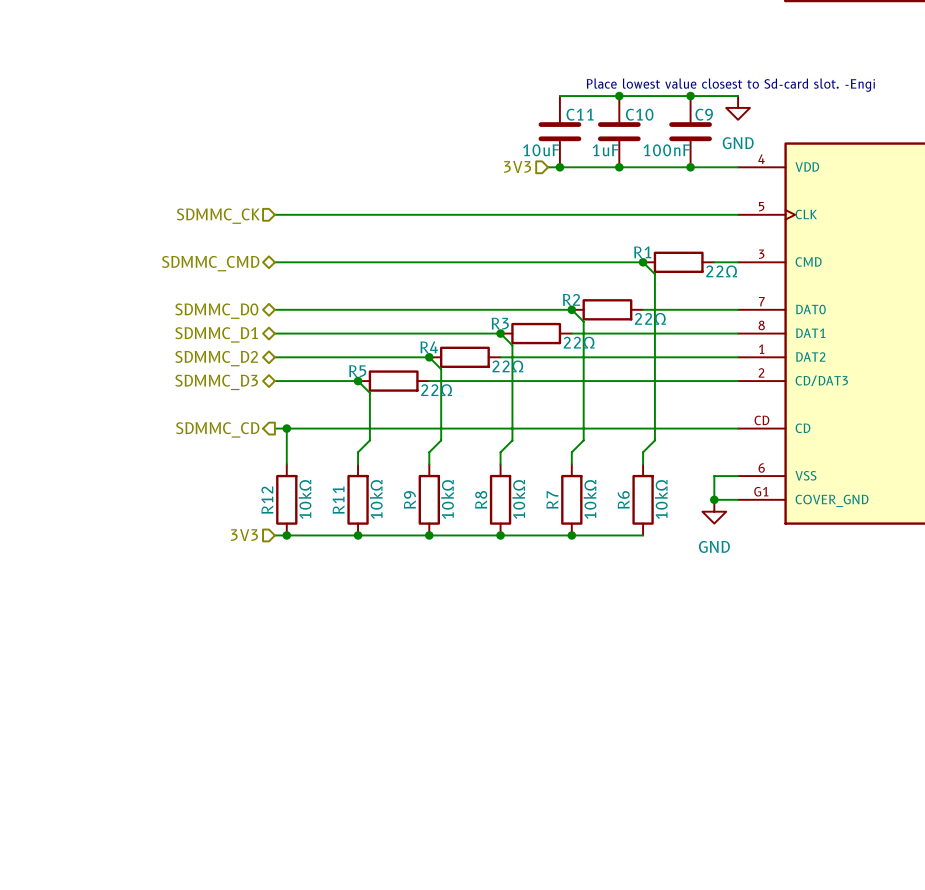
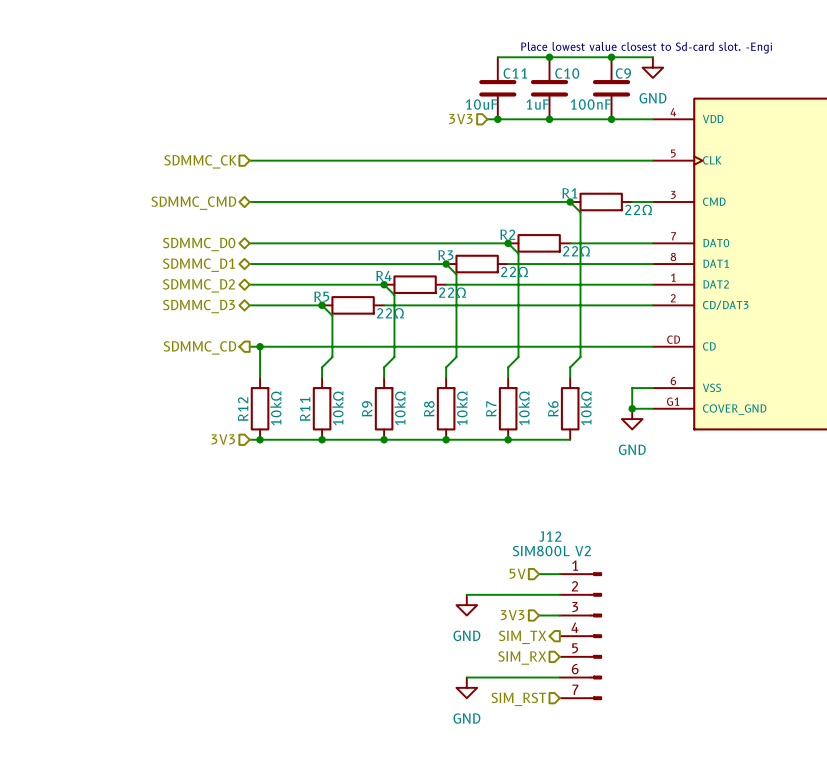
hierarchical label: none -> 5V (517, 573)
wire: none -> (539, 574) (559, 574)
wire: none -> (466, 594) (559, 594)
power symbol: none -> GND (466, 605)
hierarchical label: none -> 3V3 (512, 615)
wire: none -> (539, 615) (559, 615)
J12: none -> SIM800L V2 (580, 636)
hierarchical label: none -> SIM_TX (522, 637)
hierarchical label: none -> SIM_RX (522, 658)
wire: none -> (466, 677) (559, 677)
power symbol: none -> GND (466, 687)
hierarchical label: none -> SIM_RST (518, 699)

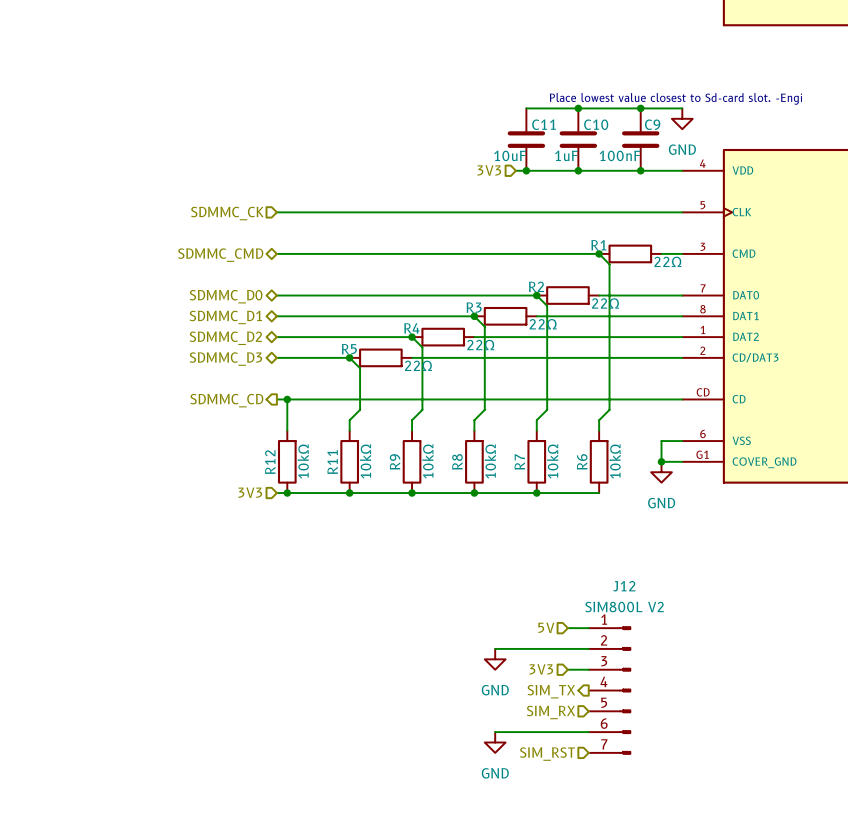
J12 name position: J12 (550, 536) -> J12 (624, 586)
J12 value position: SIM800L V2 (551, 551) -> SIM800L V2 (624, 607)

